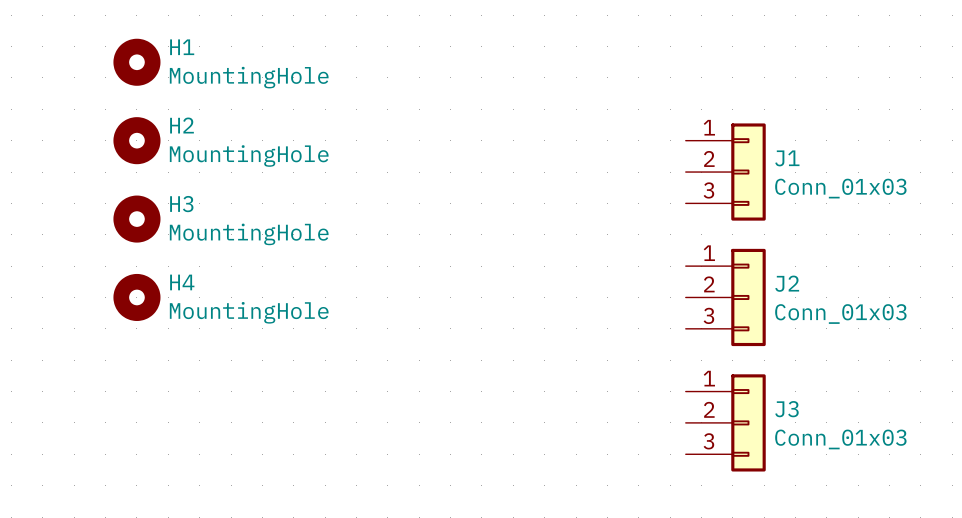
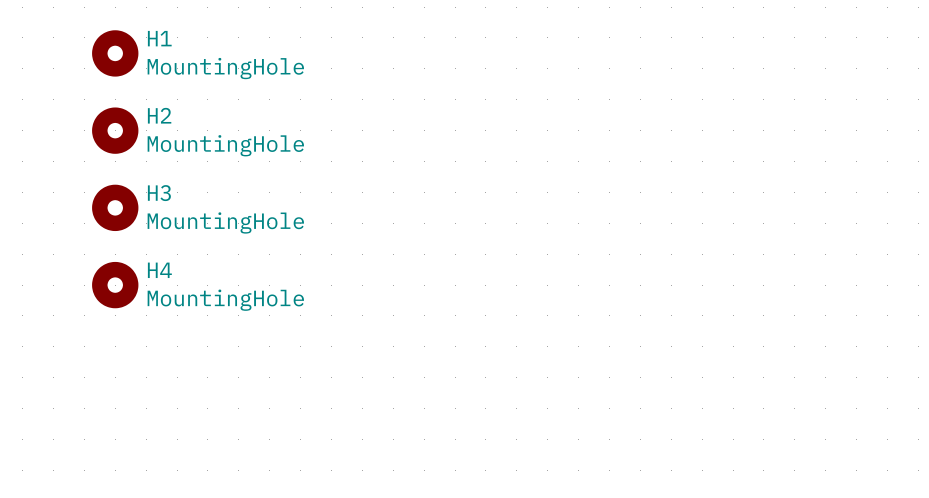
J1: Conn_01x03 (725, 172) -> none
J2: Conn_01x03 (725, 297) -> none
J3: Conn_01x03 (725, 422) -> none

